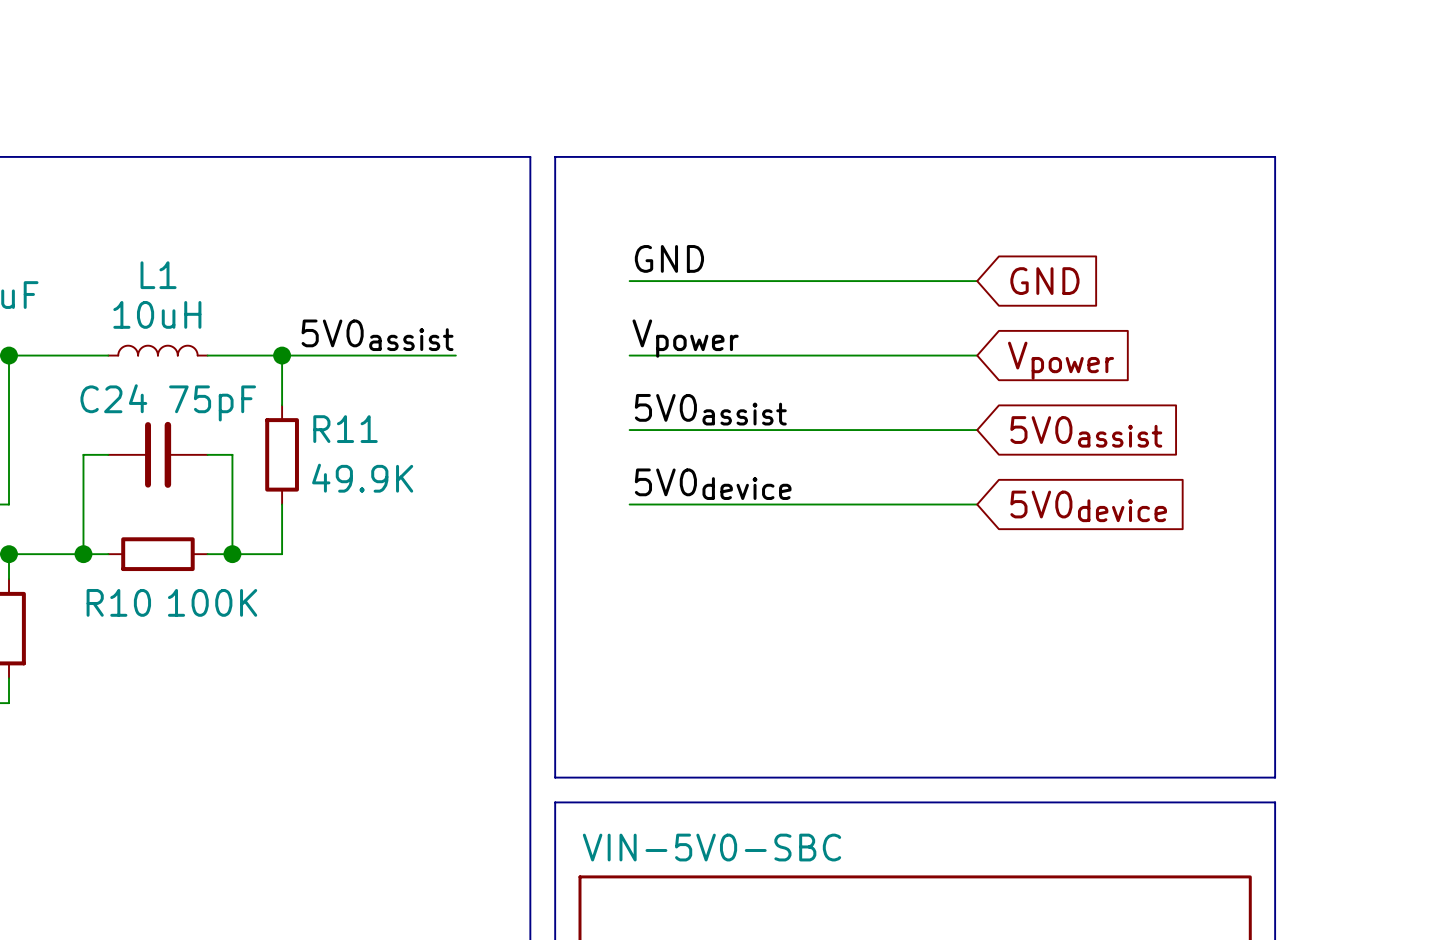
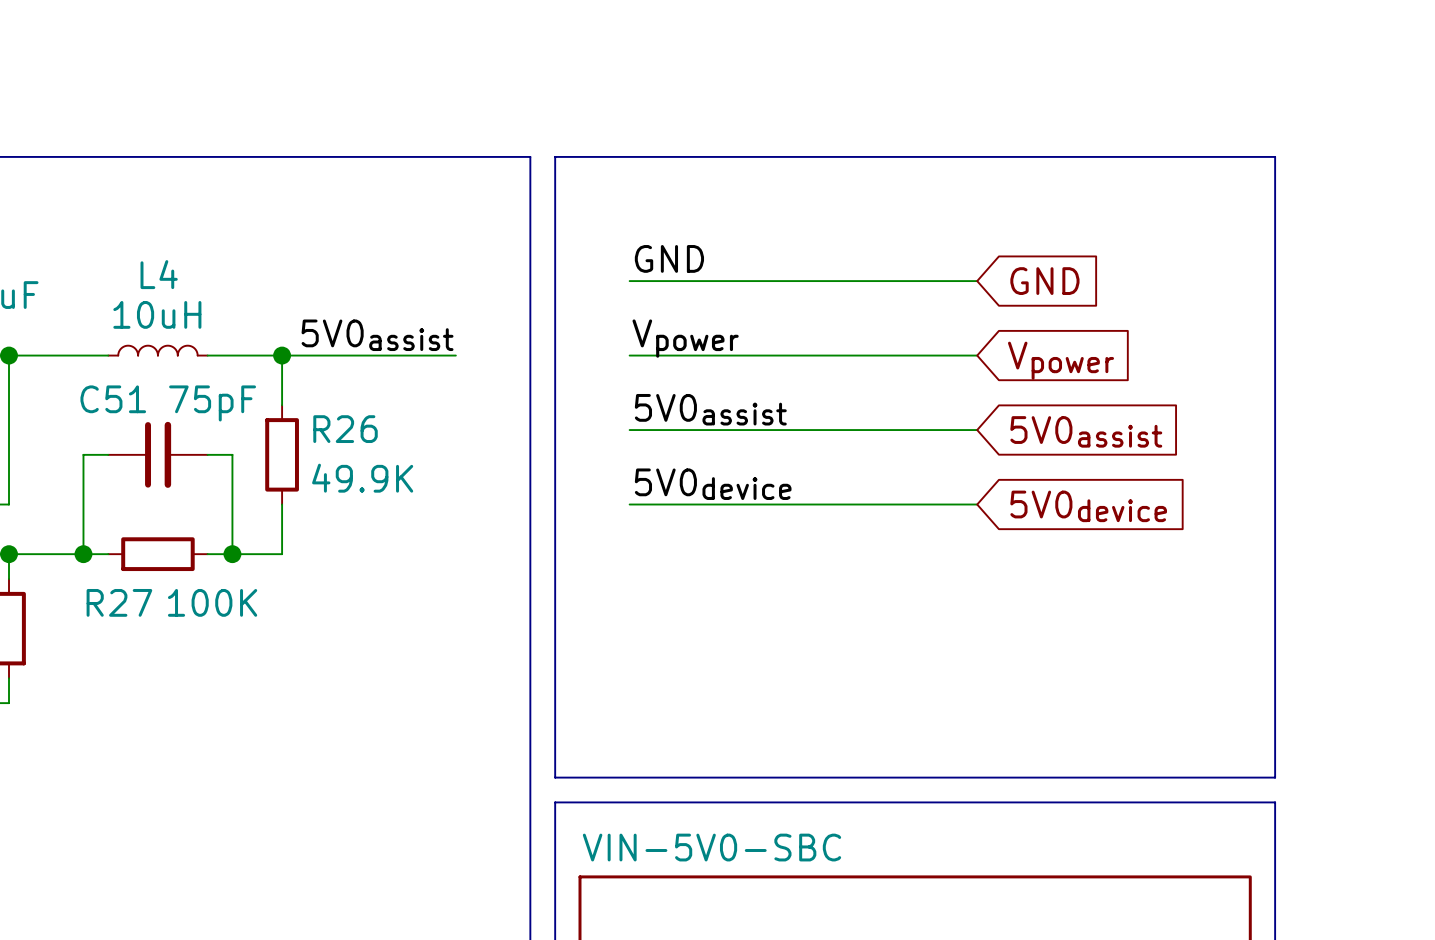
L1 name: L1 (158, 275) -> L4 (159, 274)
C24 name: C24 (113, 398) -> C51 (113, 399)
R11 name: R11 (345, 429) -> R26 (345, 429)
R10 name: R10 (118, 602) -> R27 (119, 602)

